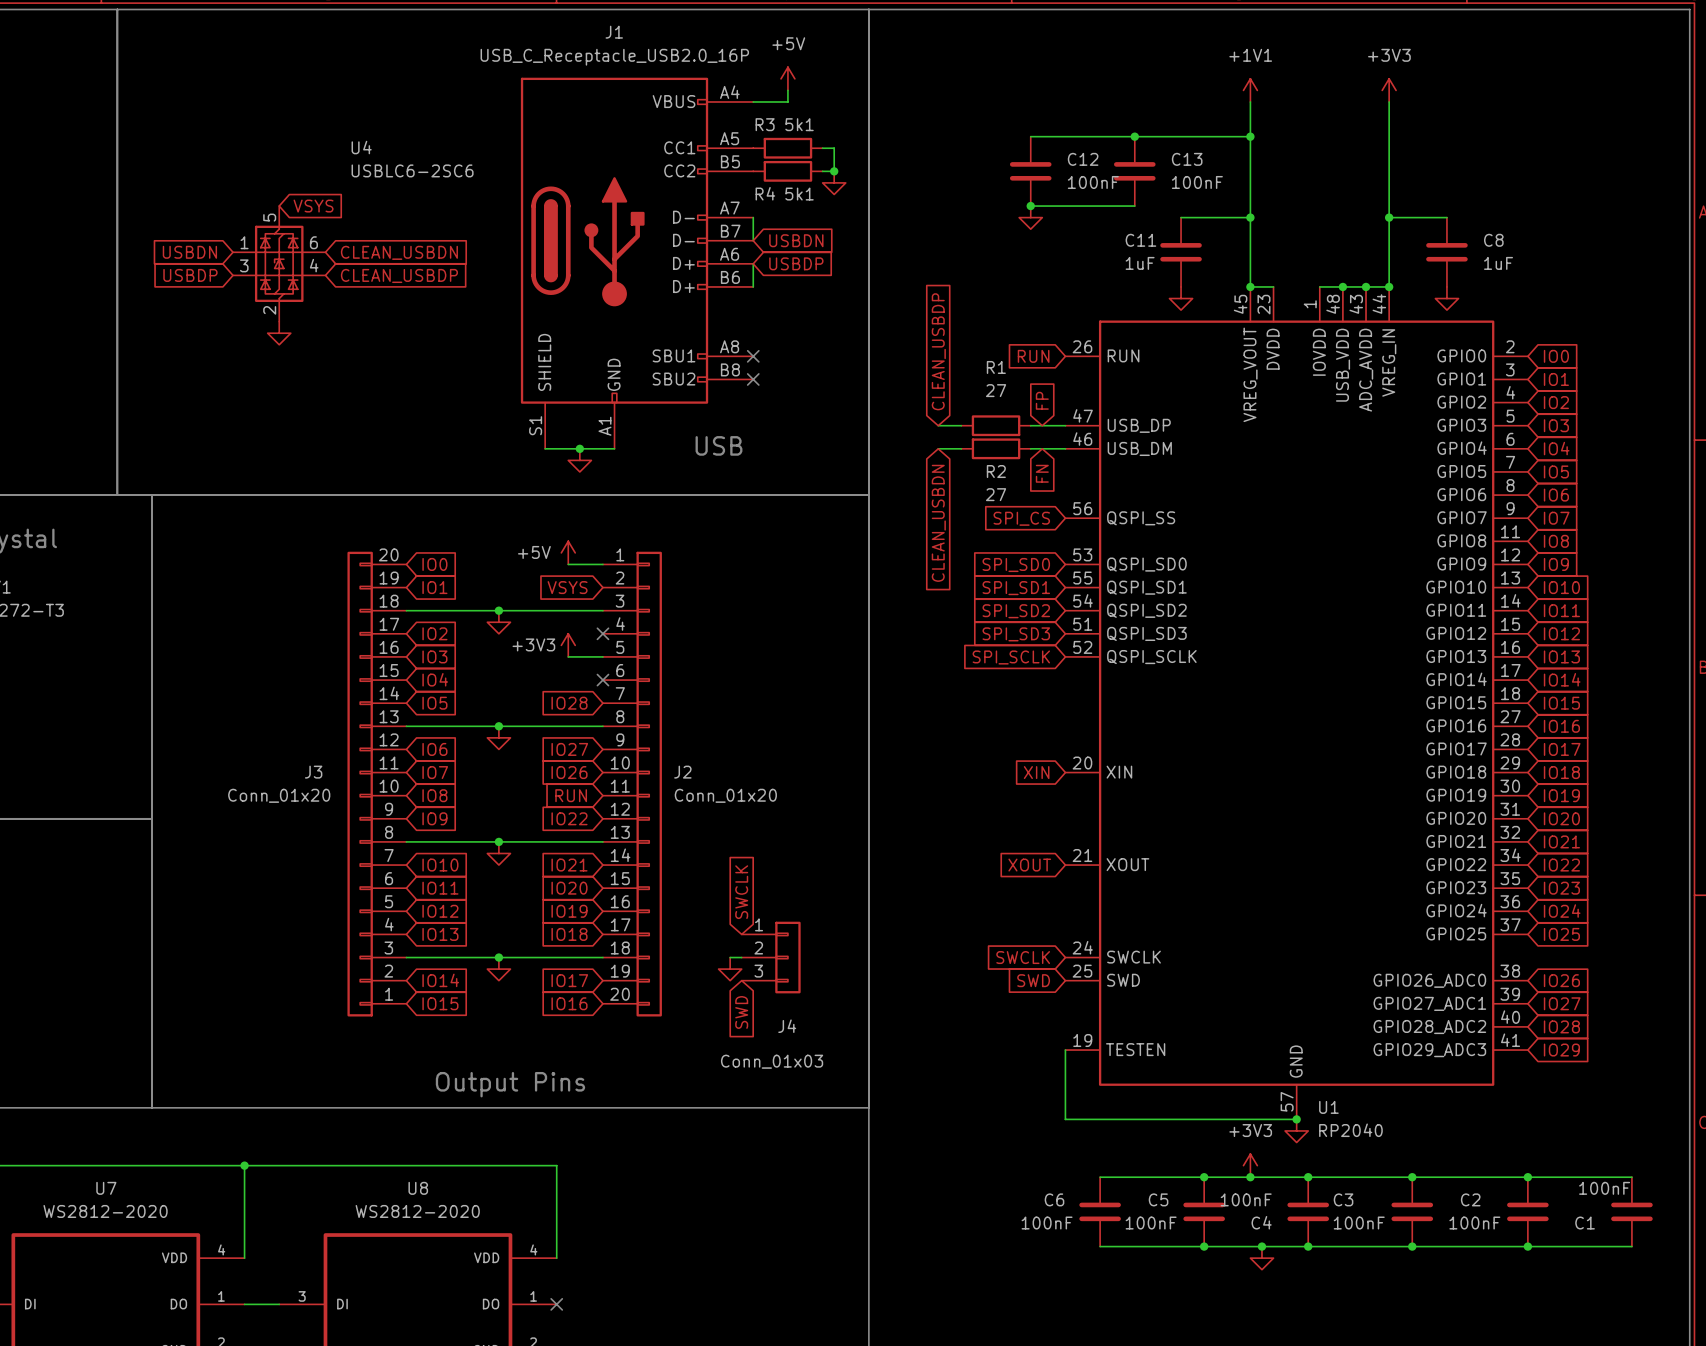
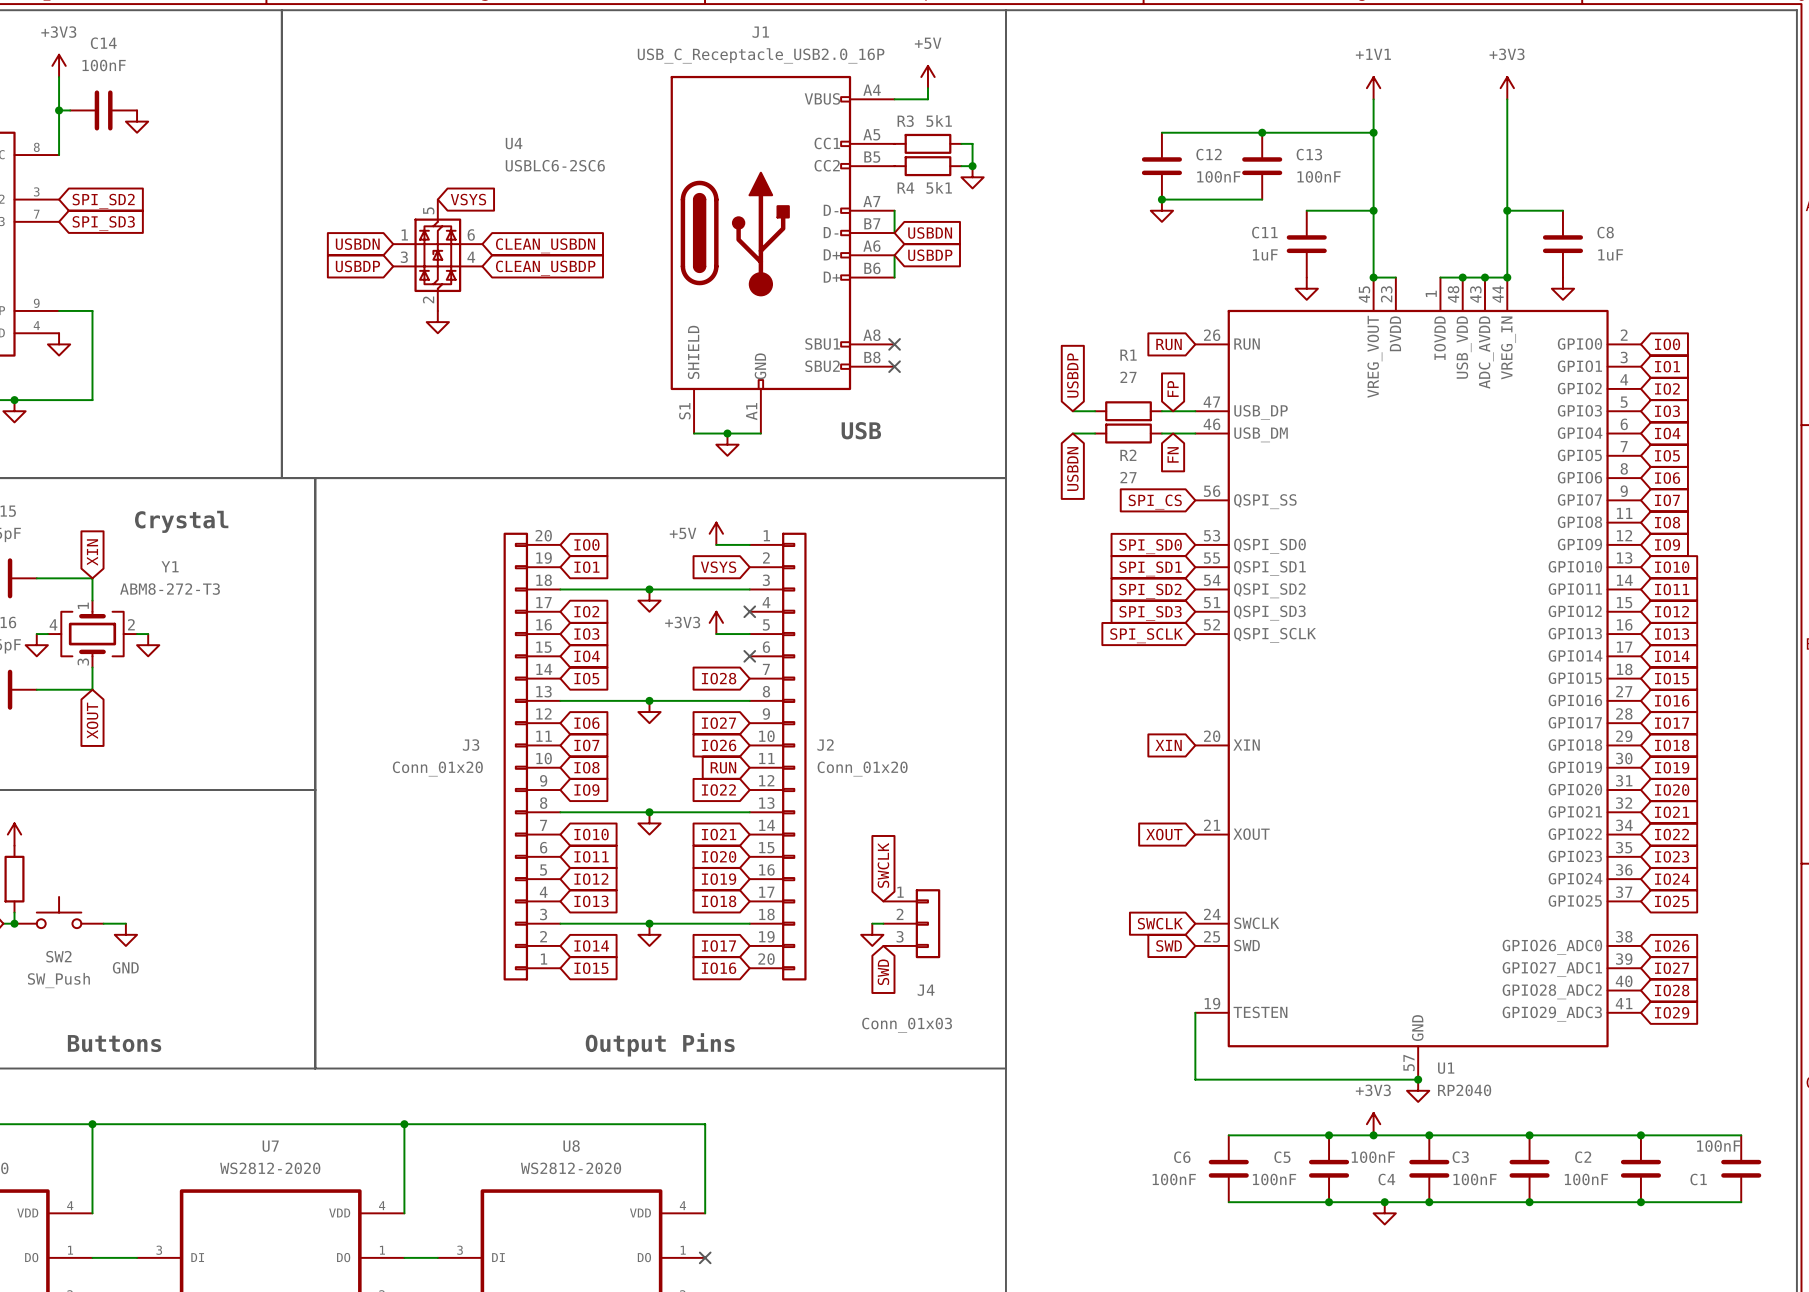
global label: CLEAN_USBDP (938, 351) -> USBDP (1072, 375)
global label: CLEAN_USBDN (938, 523) -> USBDN (1072, 469)

